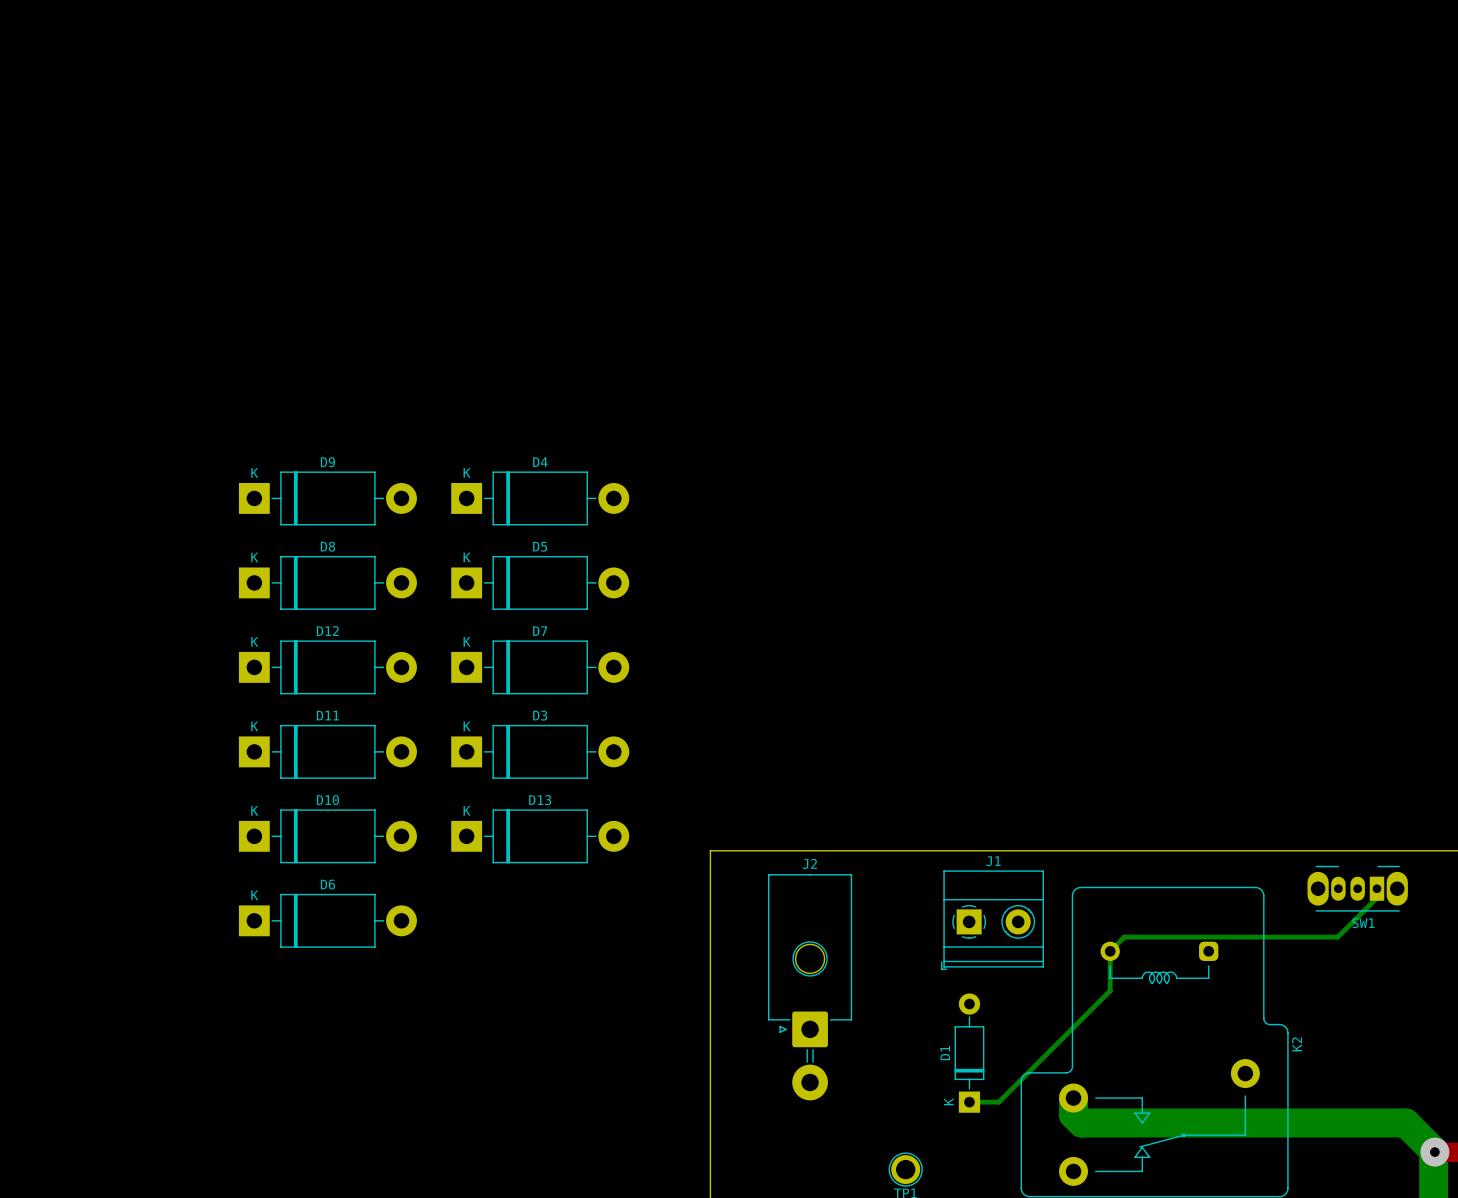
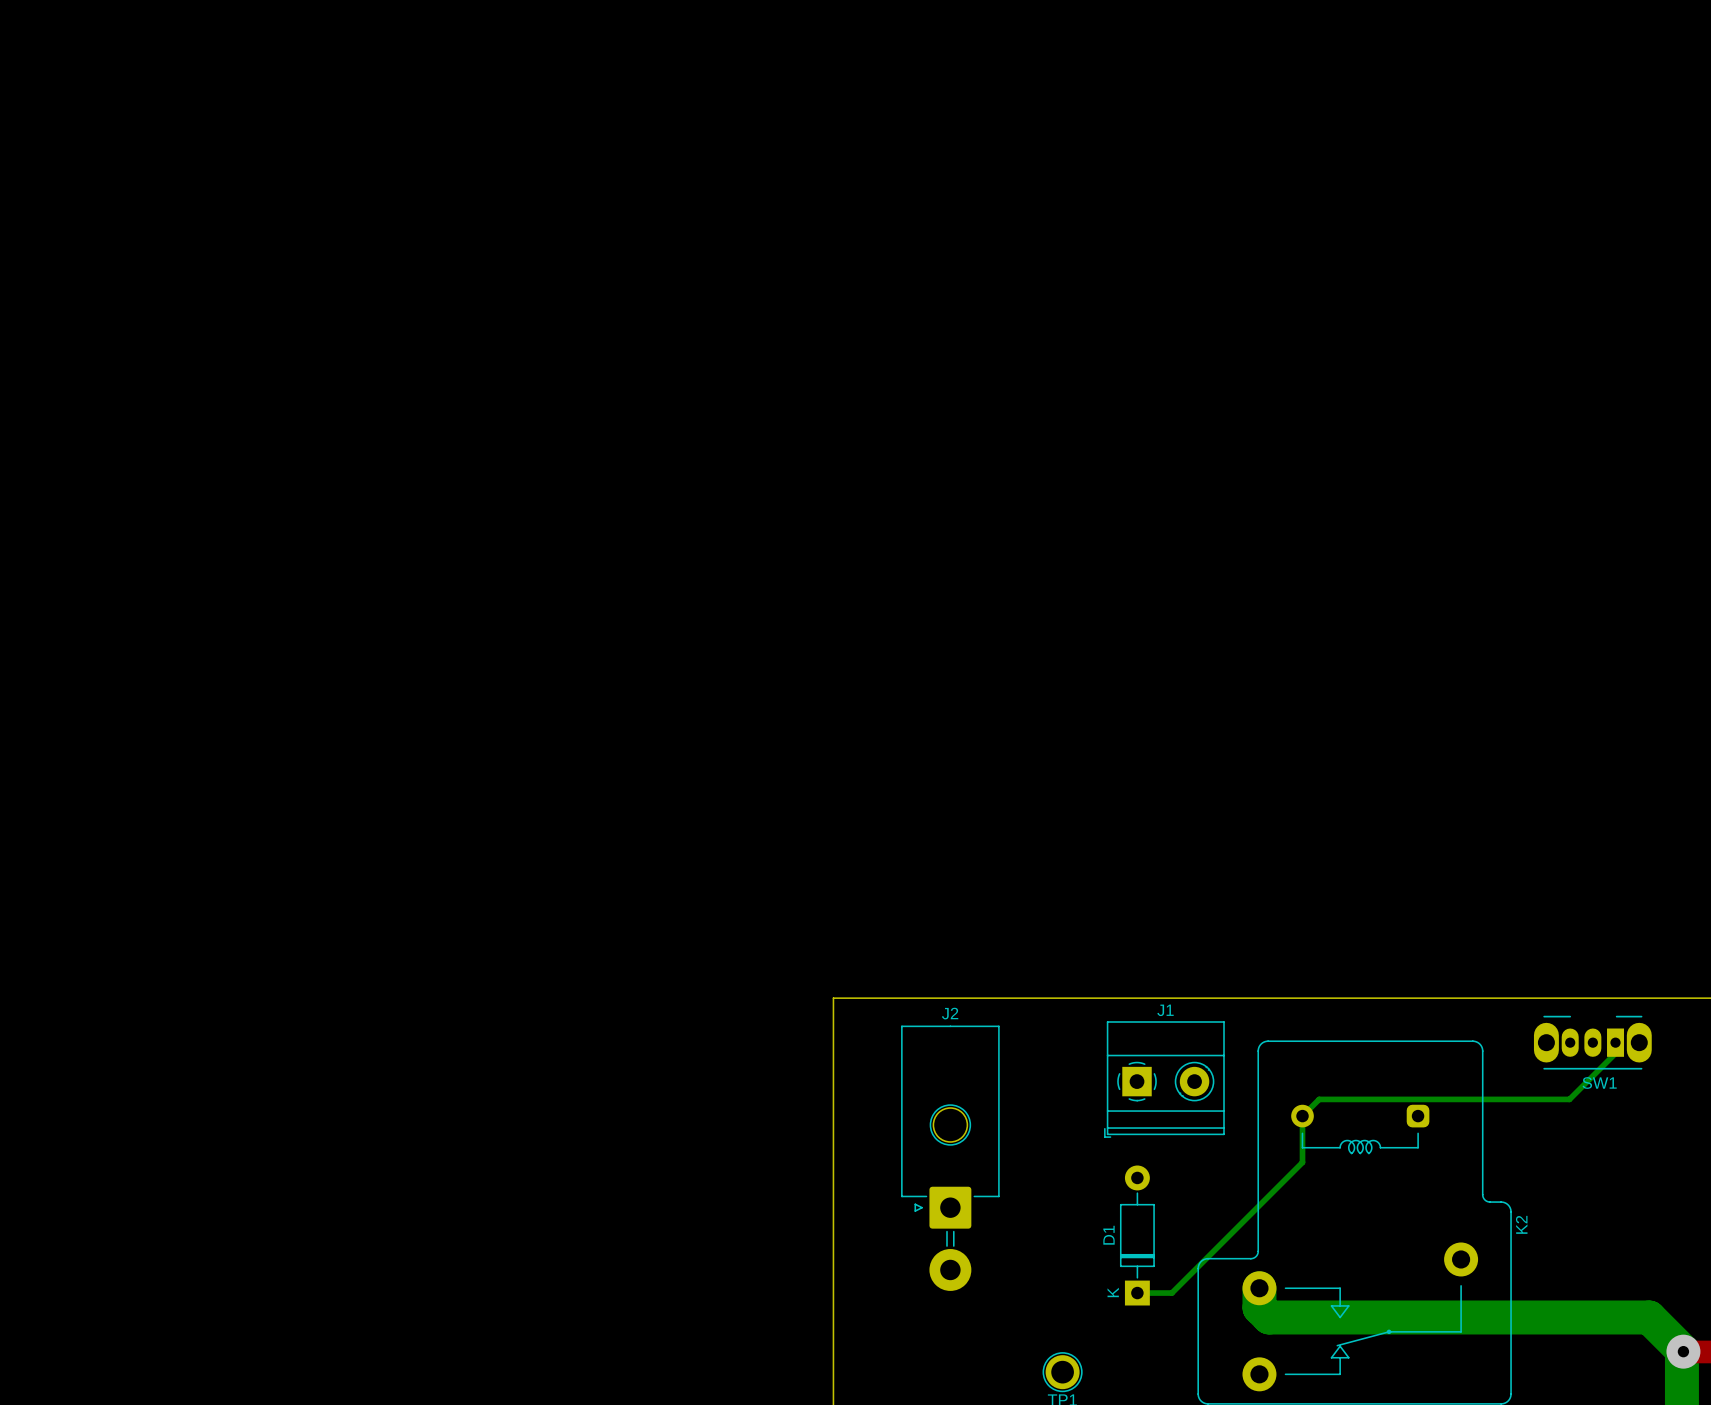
D9: (327, 498) -> none
D4: (540, 498) -> none
D8: (327, 582) -> none
D5: (540, 582) -> none
D12: (327, 667) -> none
D7: (540, 667) -> none
D11: (327, 751) -> none
D3: (540, 751) -> none
D10: (327, 836) -> none
D13: (540, 836) -> none
D6: (327, 920) -> none

